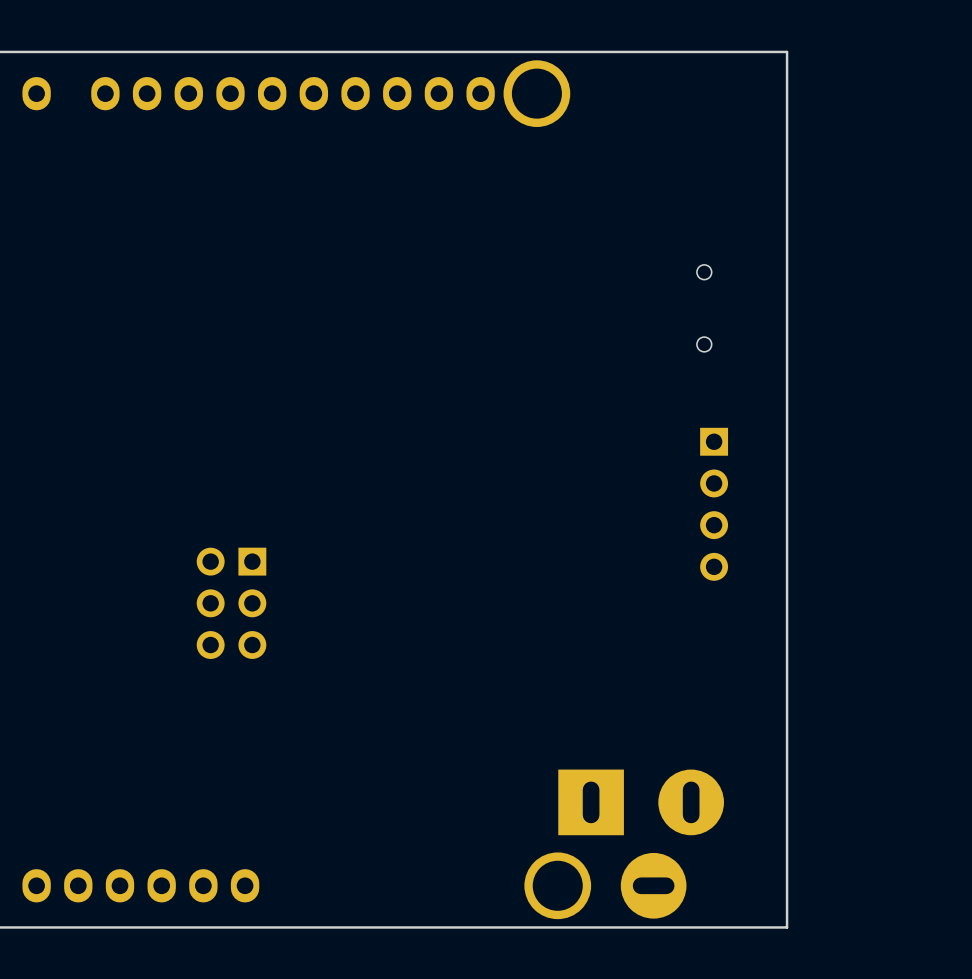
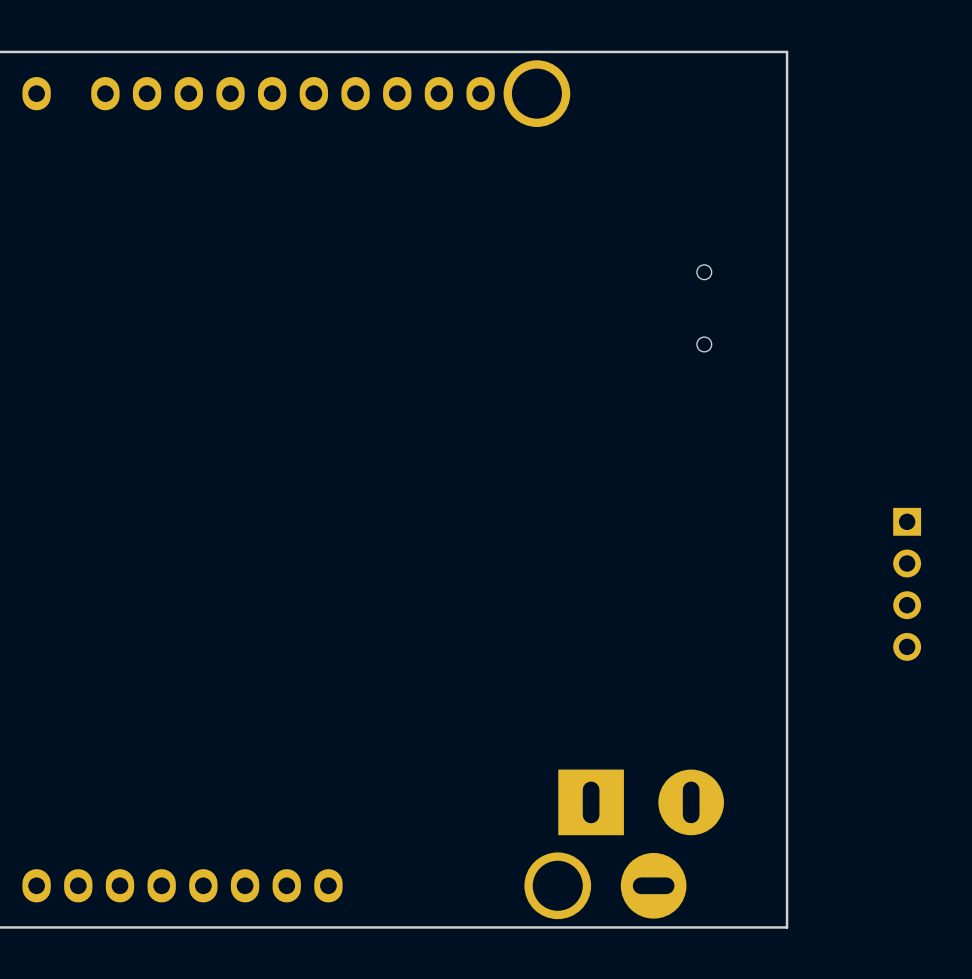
part position: (714, 504) -> (907, 584)
part: (231, 603) -> none
part: none -> (182, 885)

